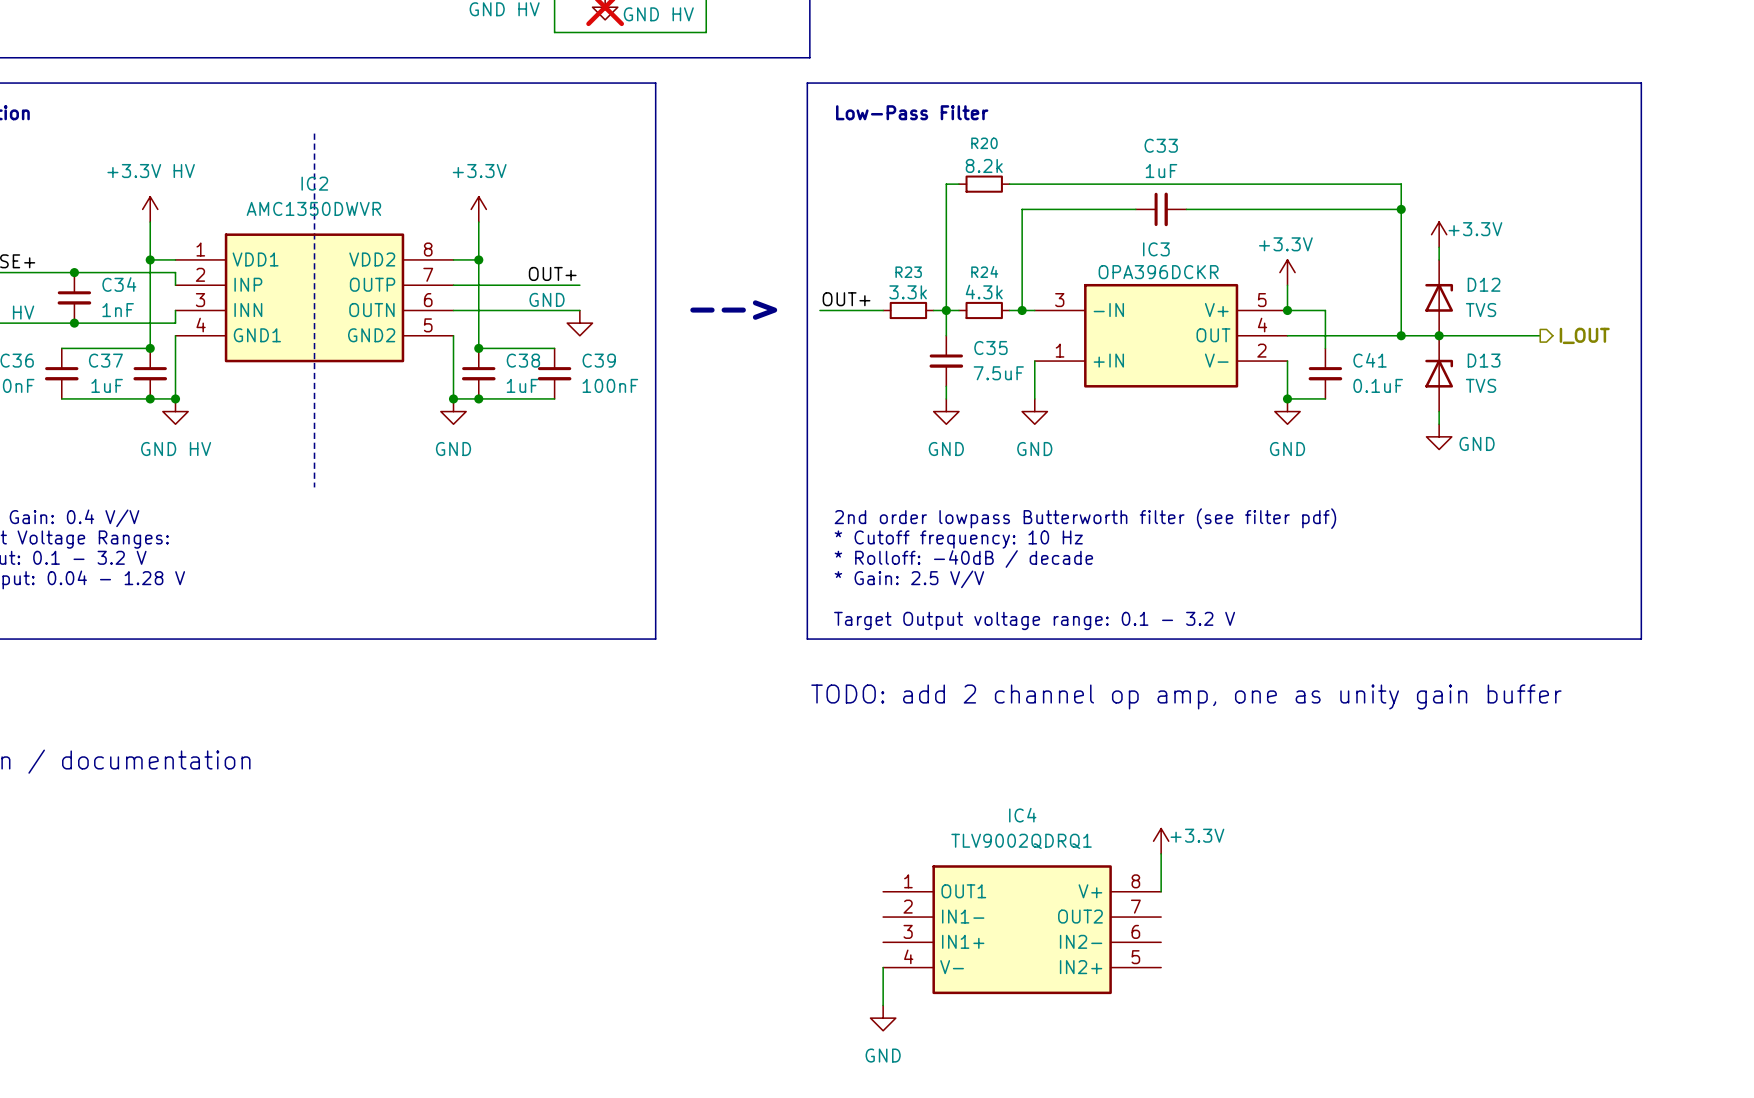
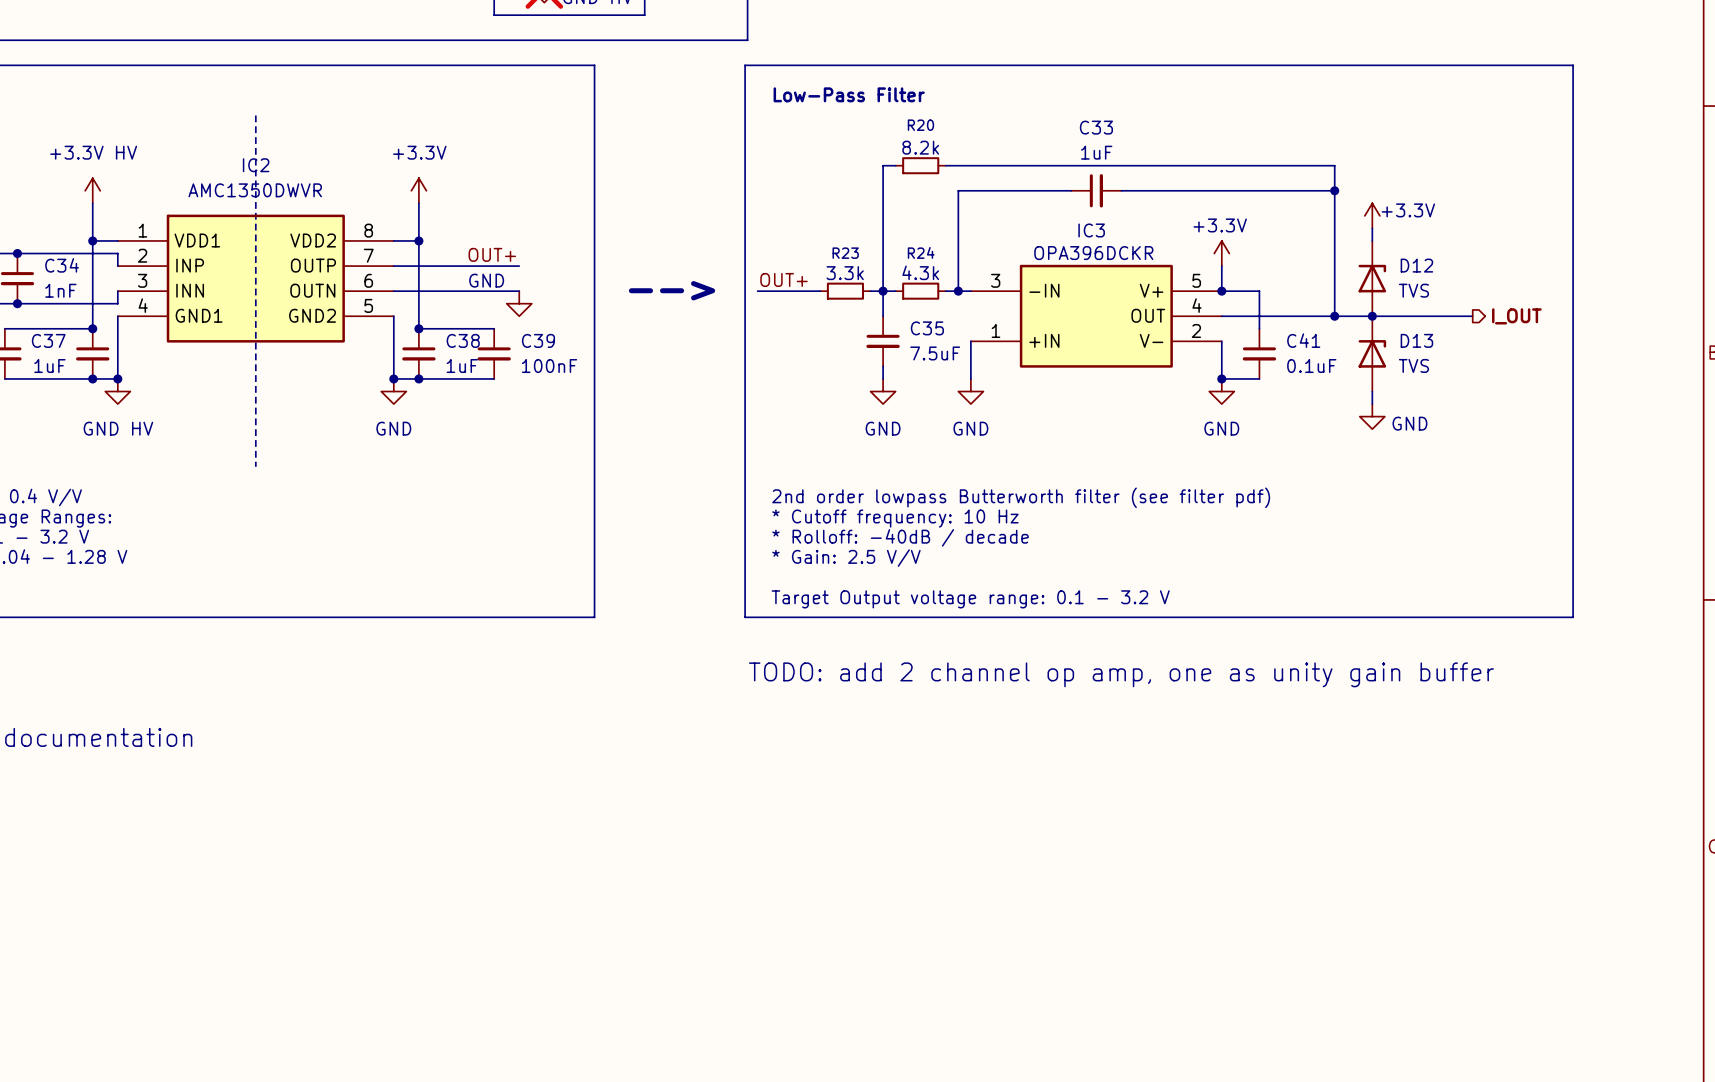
power symbol: +3.3V (1161, 841) -> none
wire: (1161, 853) (1161, 891) -> none
IC4: TLV9002QDRQ1 (1022, 929) -> none
wire: (883, 967) (883, 1005) -> none
power symbol: GND (883, 1018) -> none

